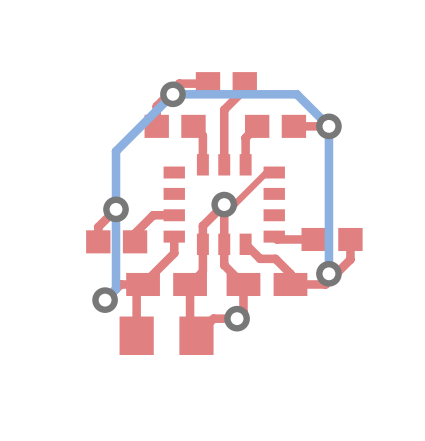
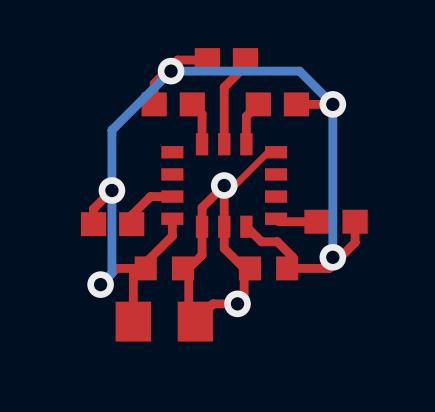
part footprint: [126, 272, 207, 297] -> [134, 256, 195, 281]
part footprint: [226, 272, 308, 297] -> [238, 256, 299, 281]

